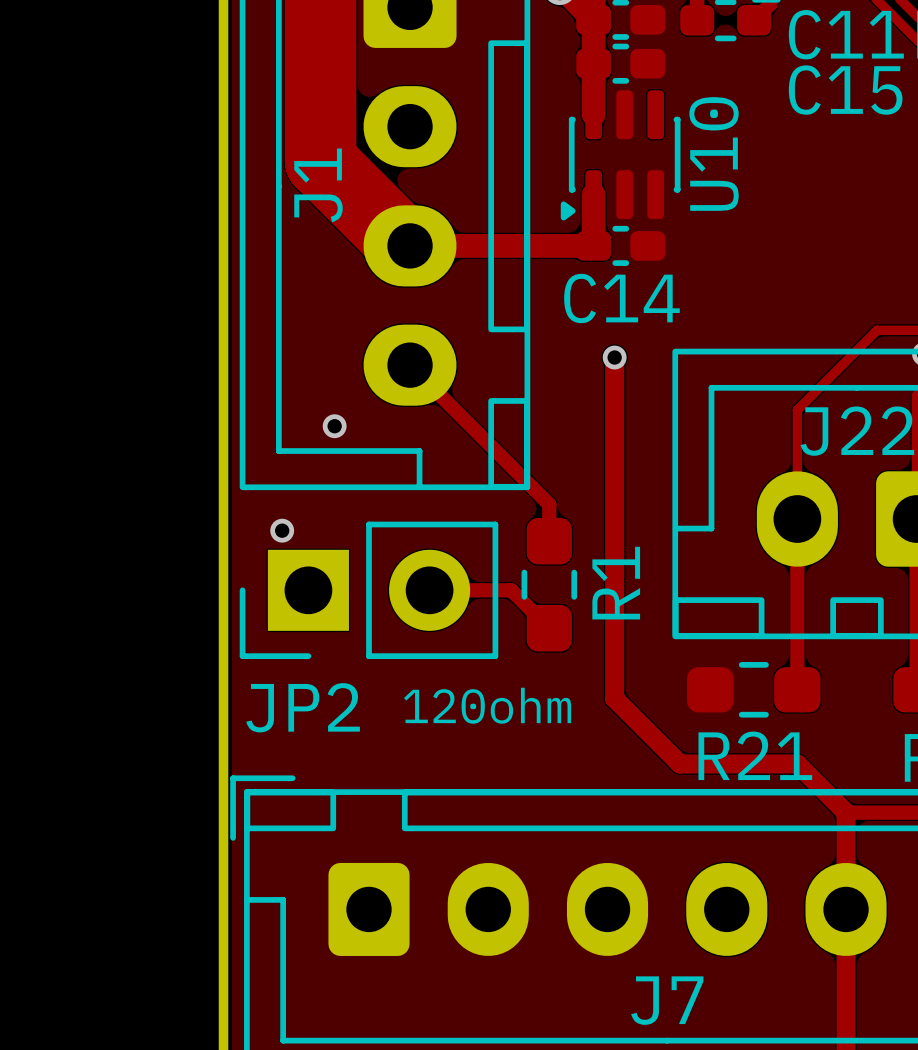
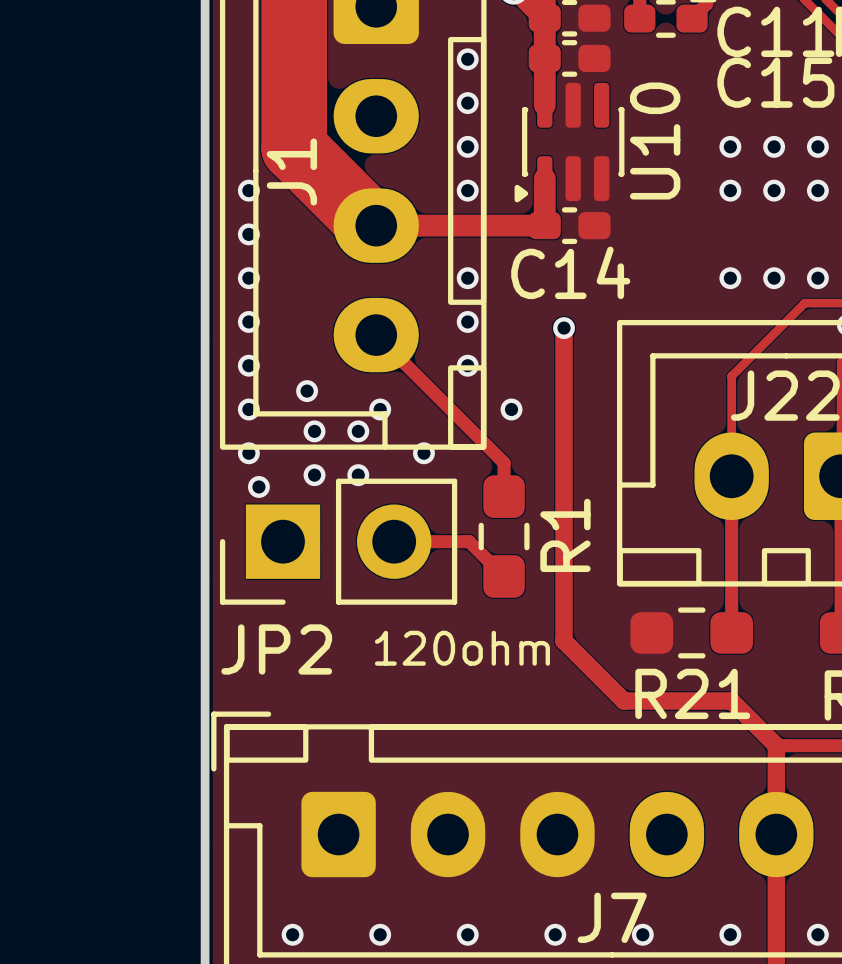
via: none -> (467, 59)
via: none -> (467, 103)
via: none -> (467, 146)
via: none -> (730, 146)
via: none -> (774, 146)
via: none -> (817, 146)
via: none -> (248, 190)
via: none -> (467, 190)
via: none -> (730, 190)
via: none -> (774, 190)
via: none -> (817, 190)
via: none -> (248, 234)
via: none -> (248, 278)
via: none -> (467, 278)
via: none -> (730, 278)
via: none -> (774, 278)
via: none -> (817, 278)
via: none -> (248, 321)
via: none -> (467, 321)
via: none -> (248, 365)
via: none -> (467, 365)
via: none -> (248, 409)
via: none -> (380, 409)
via: none -> (511, 409)
via: none -> (314, 431)
via: none -> (358, 431)
via: none -> (248, 453)
via: none -> (423, 453)
via: none -> (314, 475)
via: none -> (358, 475)
via: none -> (292, 934)
via: none -> (380, 934)
via: none -> (467, 934)
via: none -> (555, 934)
via: none -> (642, 934)
via: none -> (730, 934)
via: none -> (817, 934)

